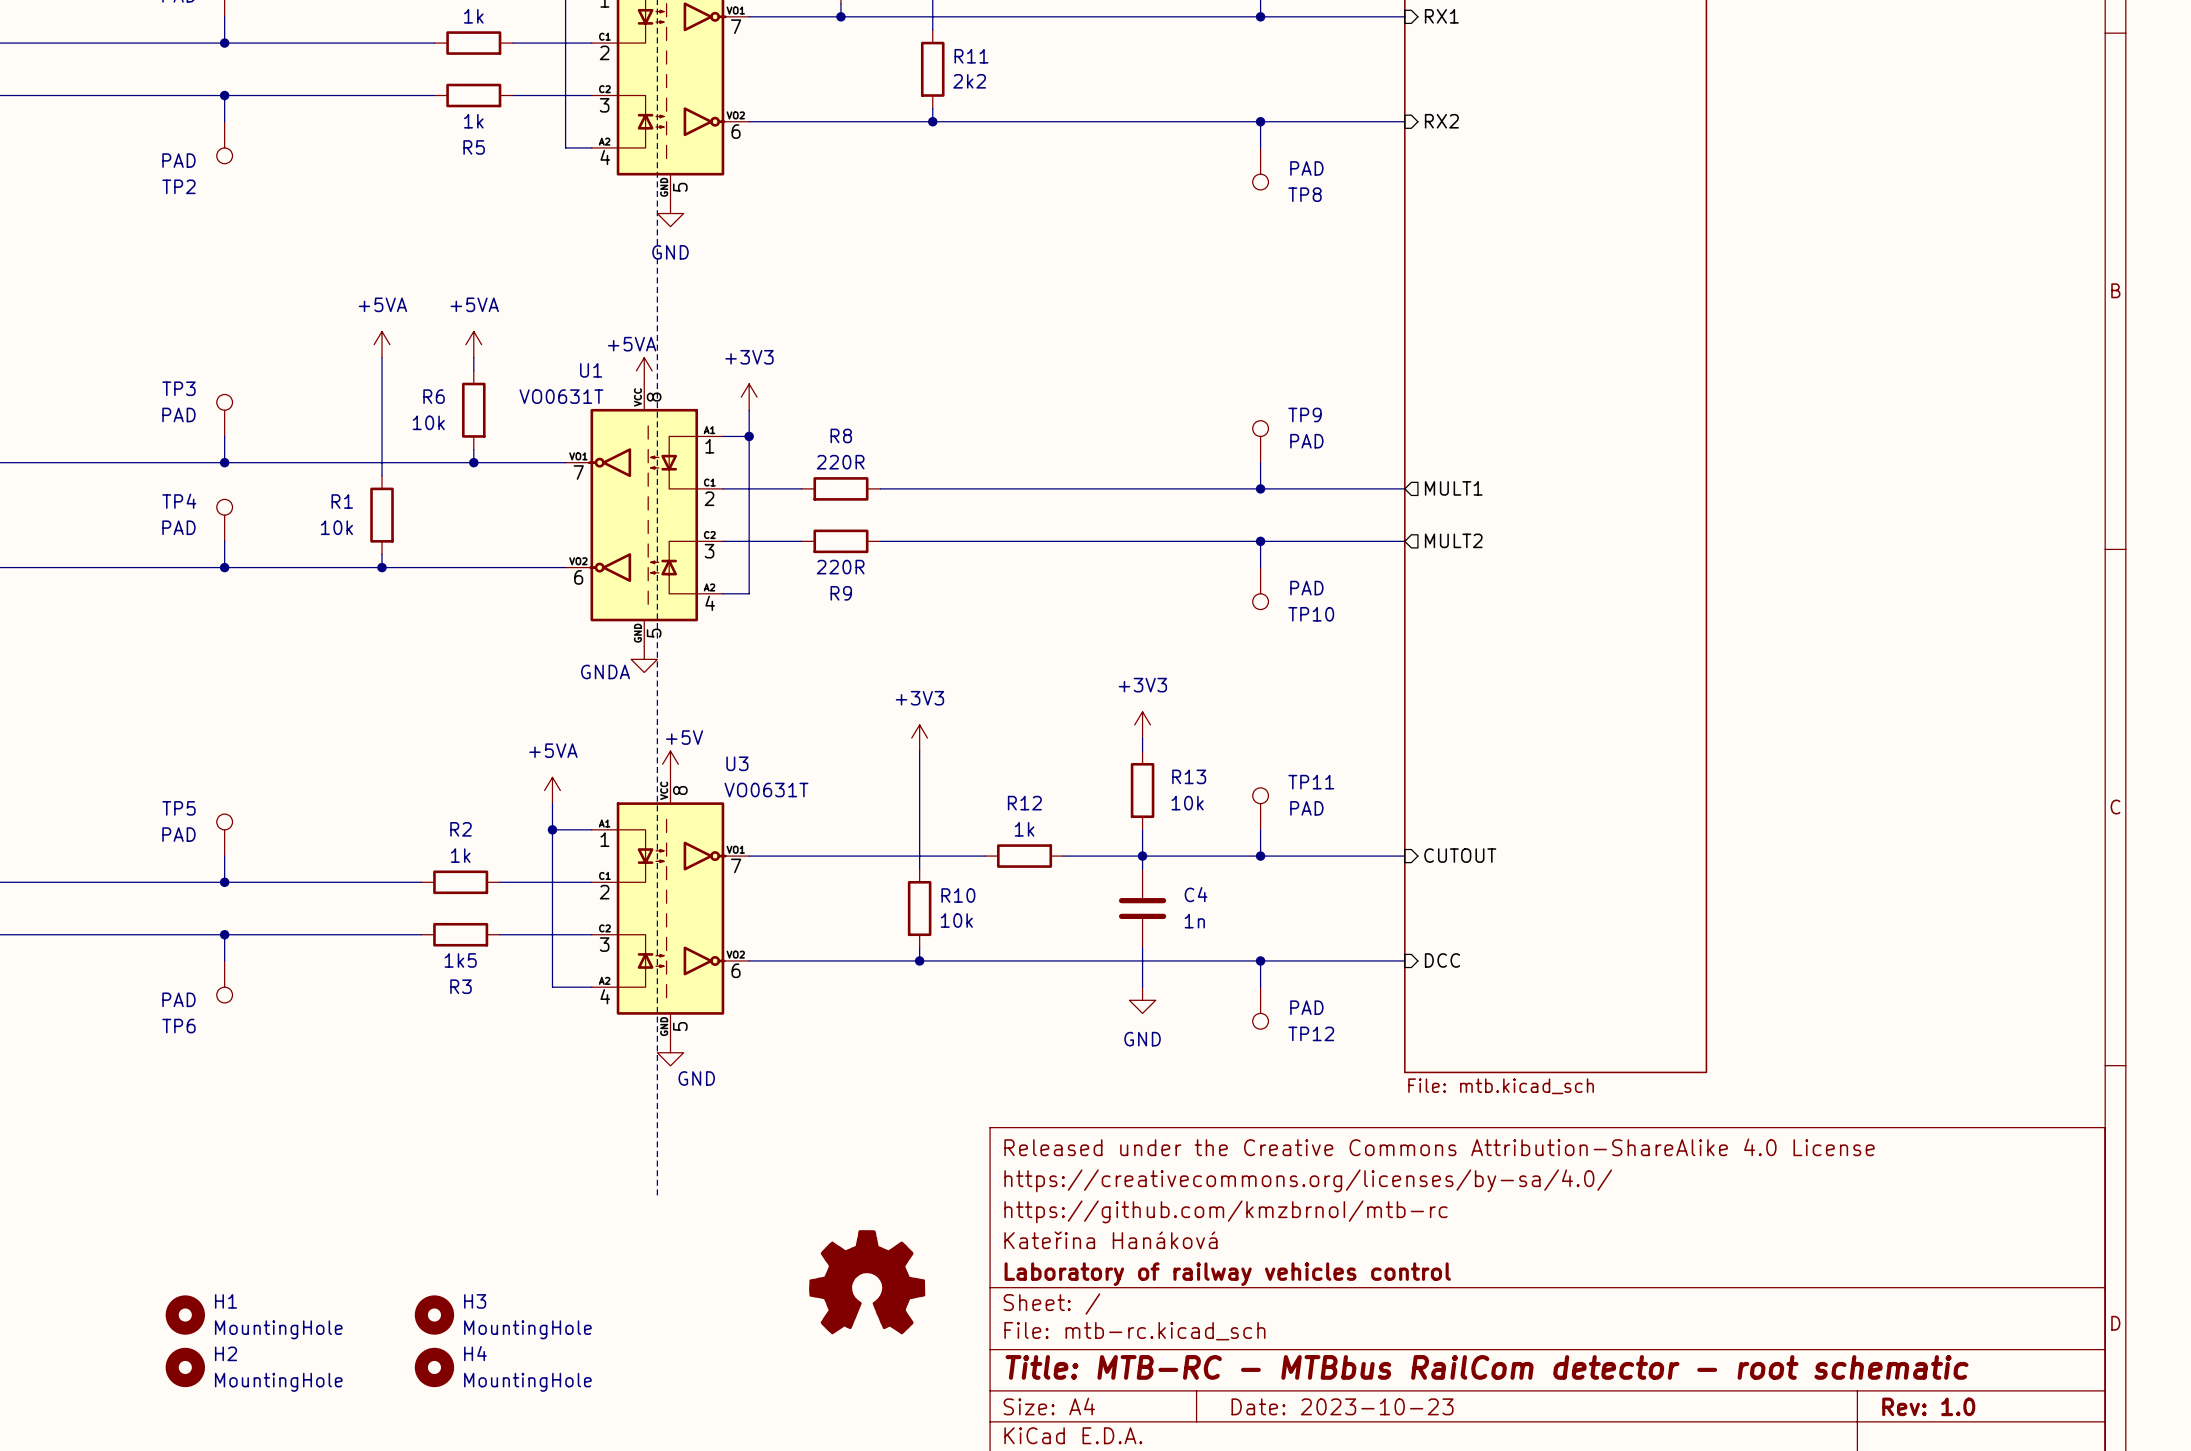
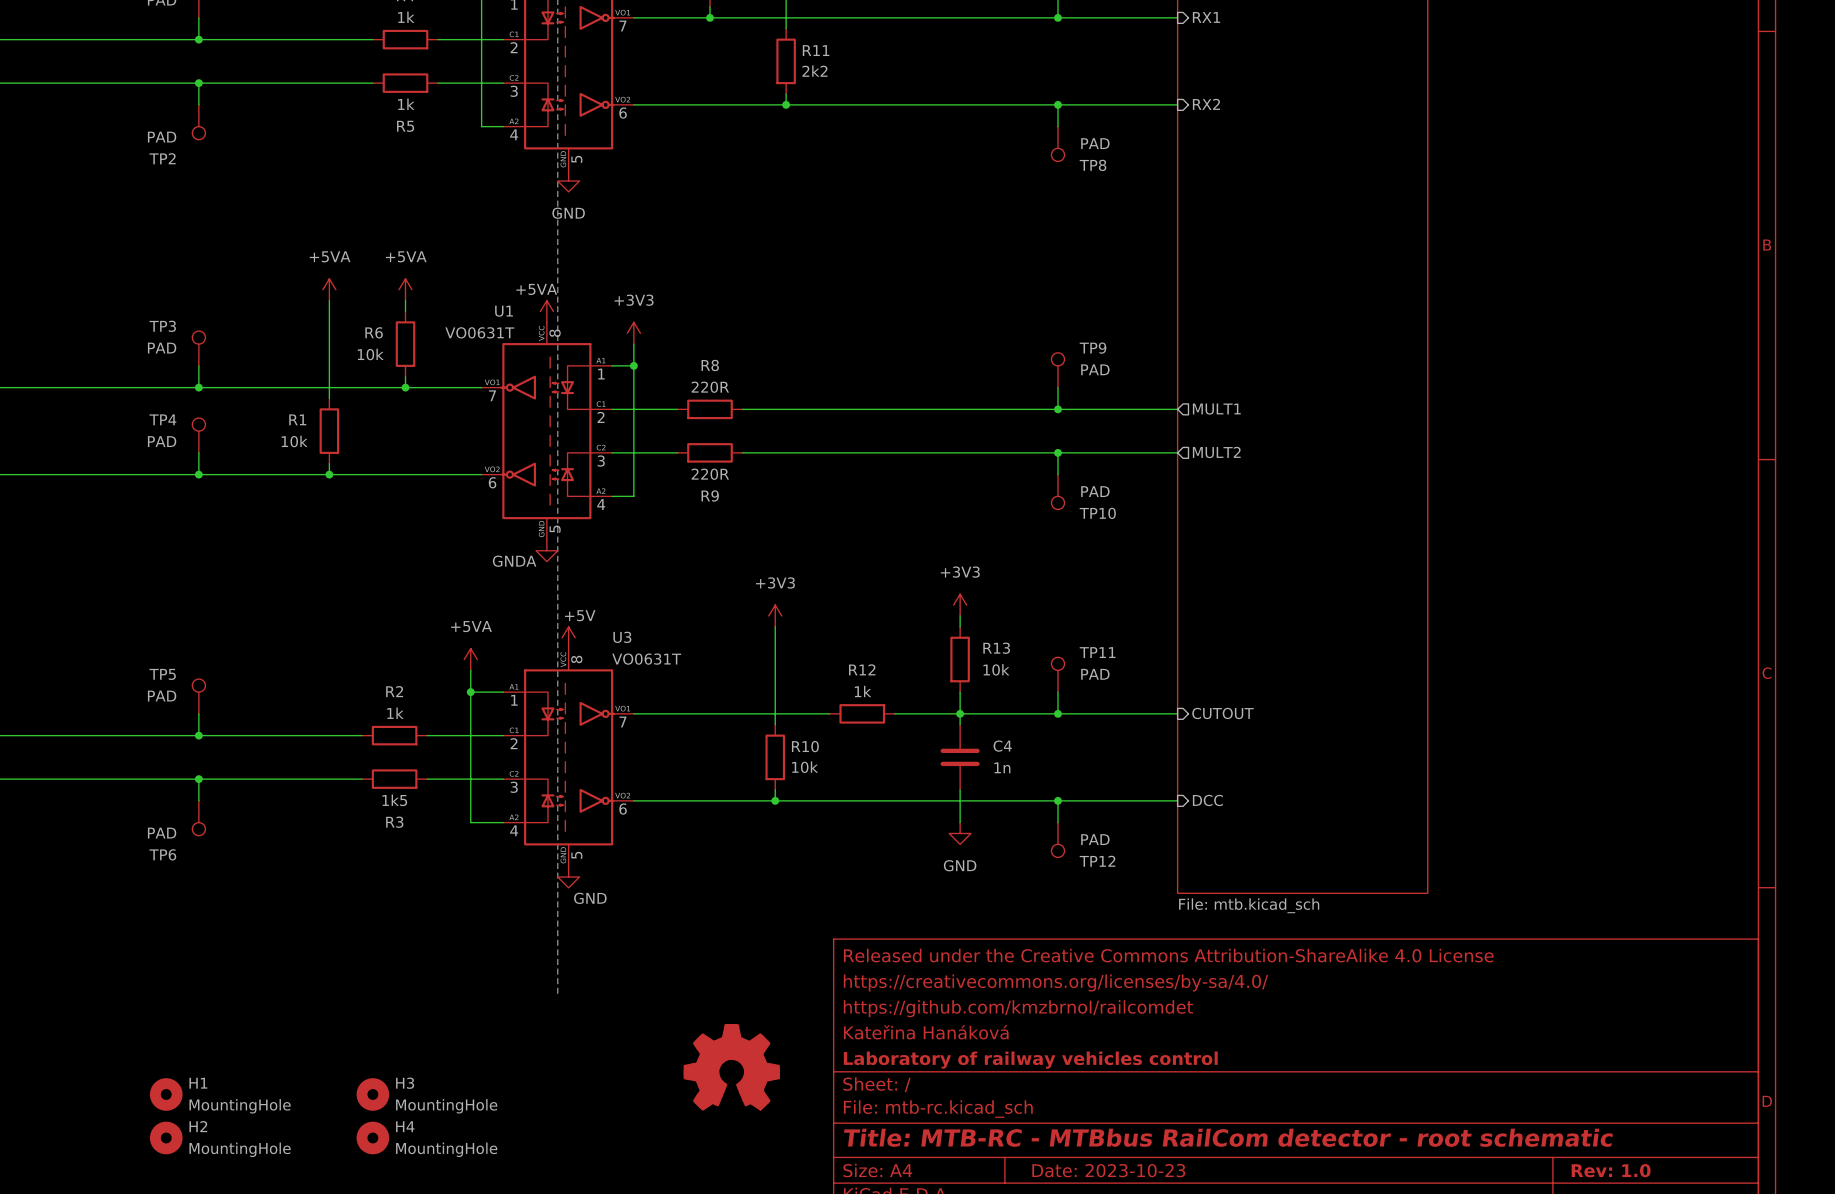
title block: https://github.com/kmzbrnoI/mtb-rc (1225, 1211) -> https://github.com/kmzbrnoI/railcomdet (1018, 1008)

